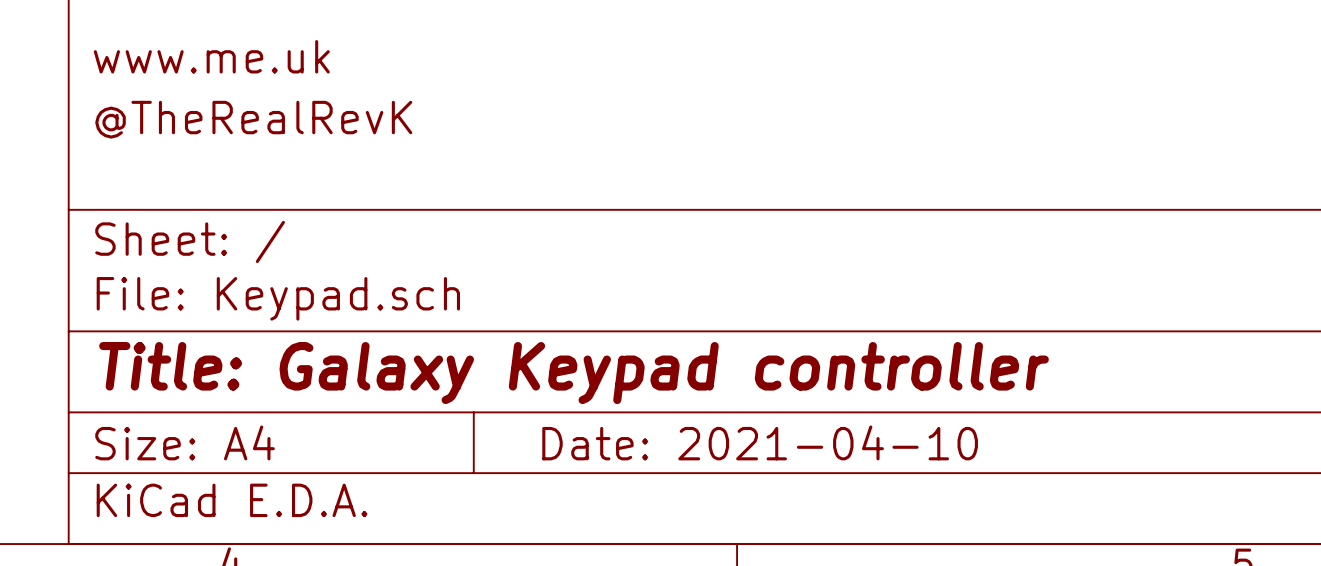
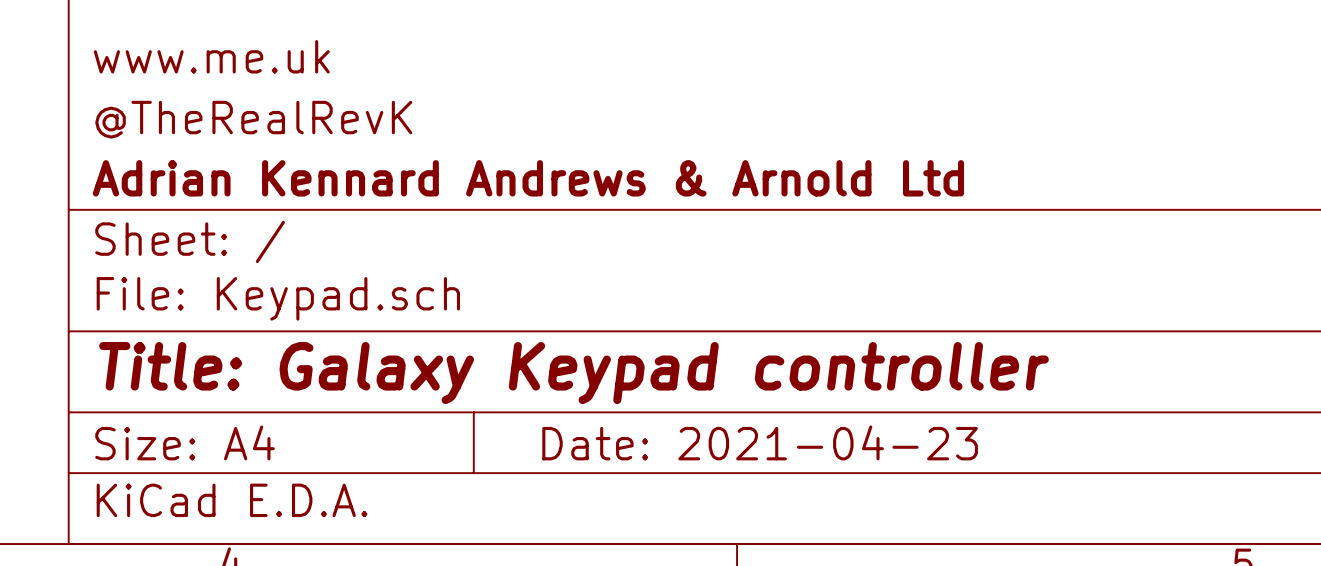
title block: none -> Adrian Kennard Andrews & Arnold Ltd (528, 178)
title block: Date: 2021-04-10 (760, 442) -> Date: 2021-04-23 (760, 442)

